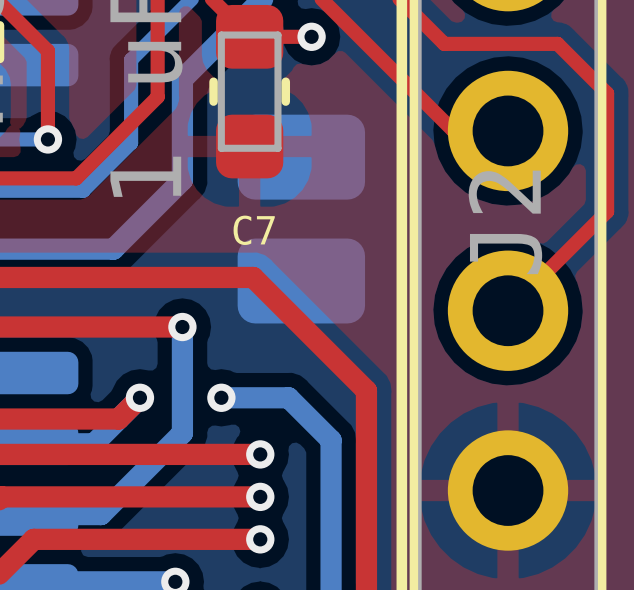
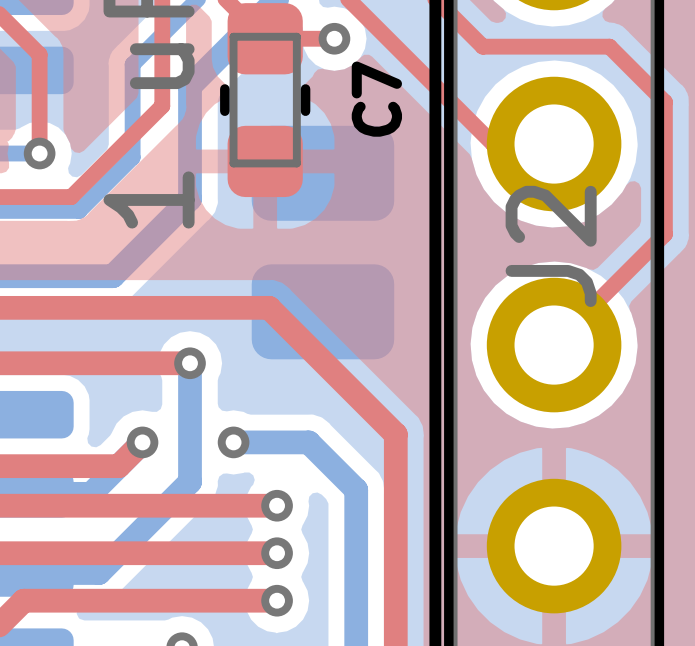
C7 name rotation: 0° (254, 230) -> 90° counterclockwise (376, 99)
C7 name position: C7 (254, 230) -> C7 (376, 99)

